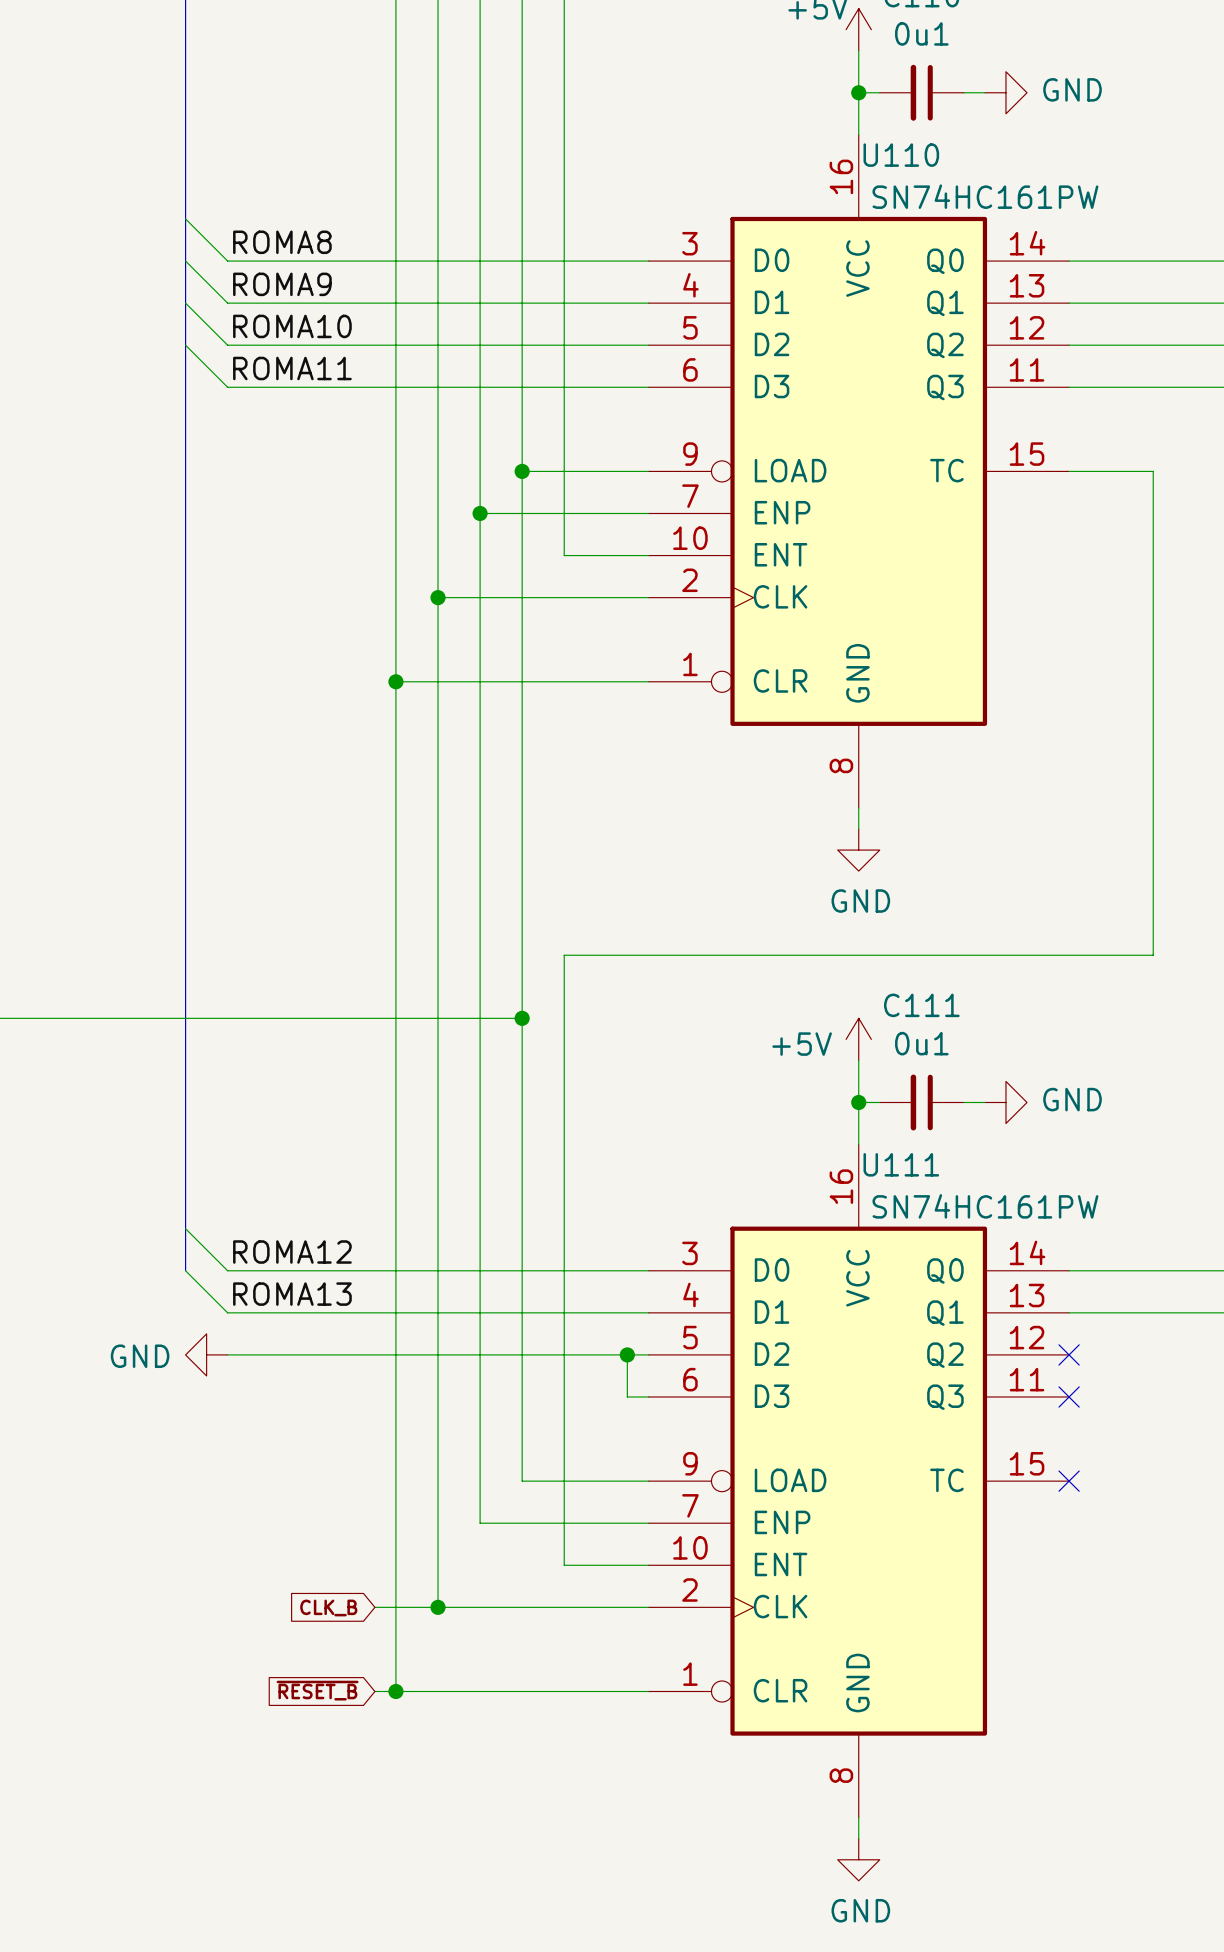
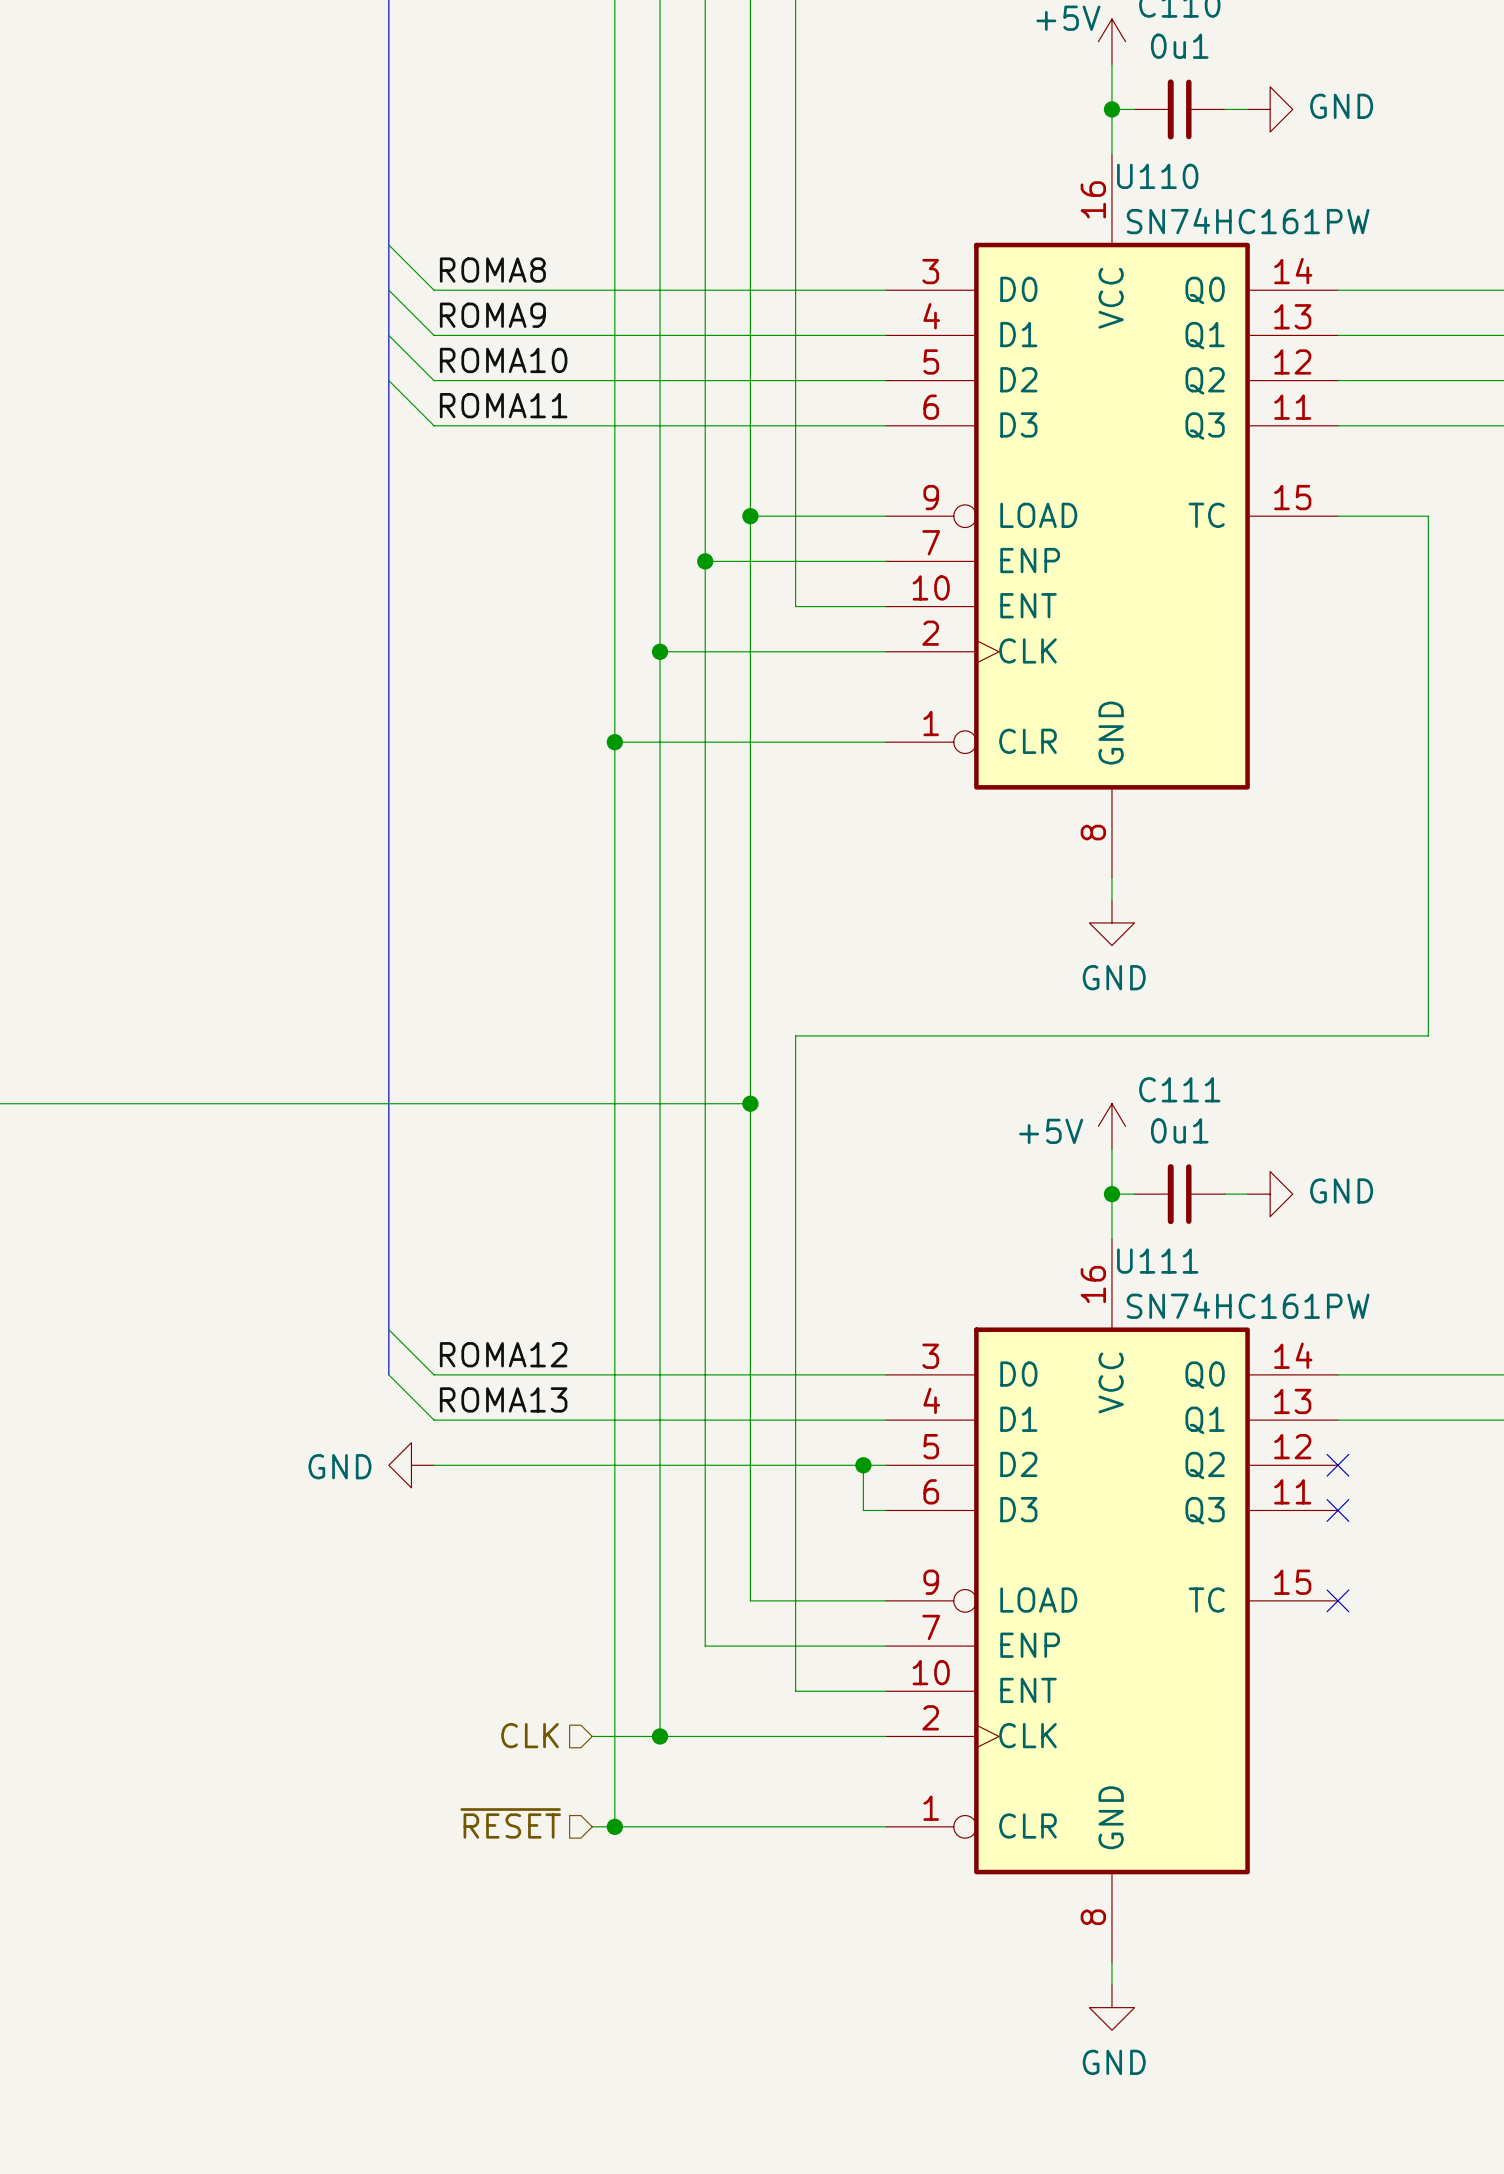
hierarchical label: none -> CLK (530, 1735)
global label: CLK_B (328, 1607) -> none
hierarchical label: none -> ~{RESET} (510, 1823)
global label: ~{RESET_B} (317, 1690) -> none

